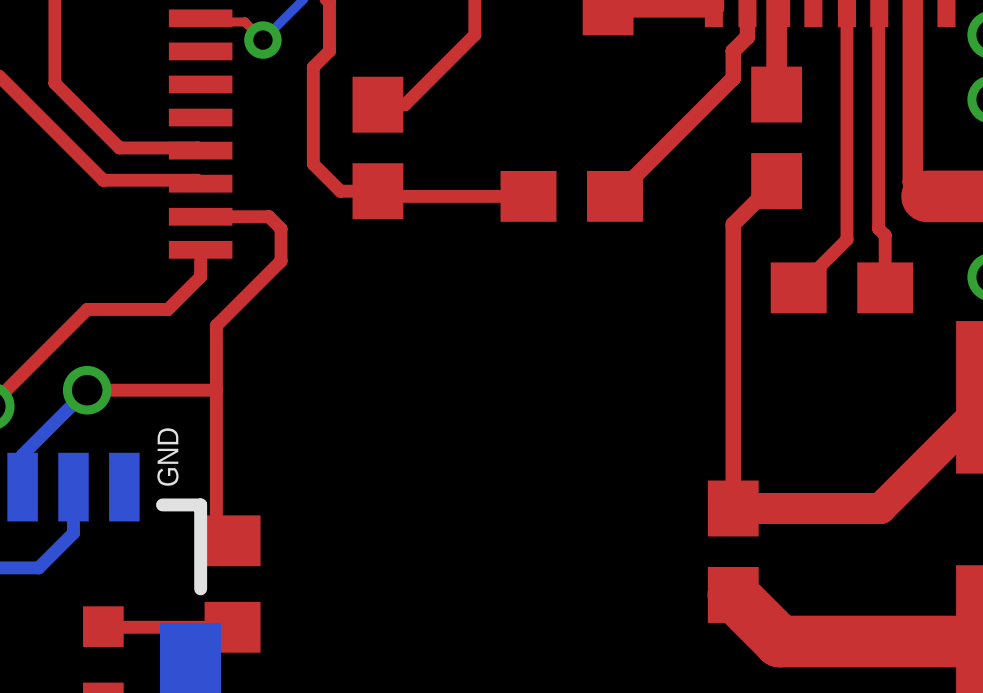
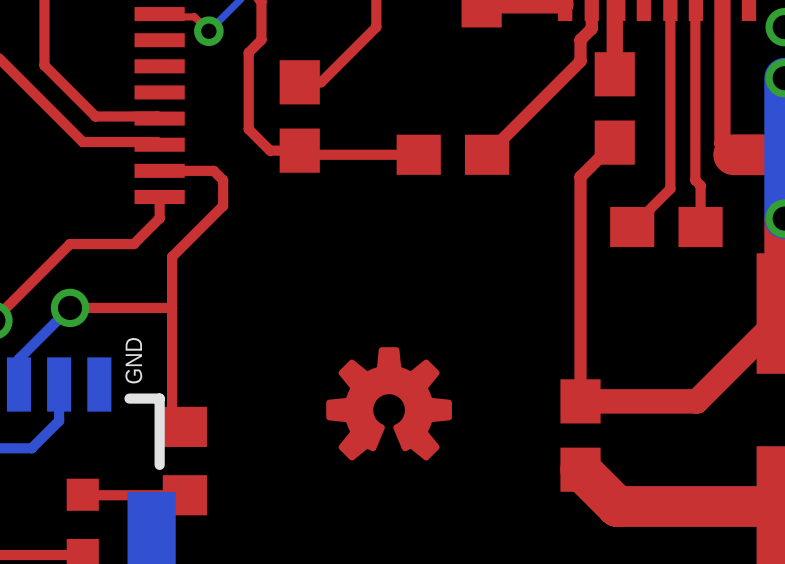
drawing: none -> [326, 347, 452, 461]

